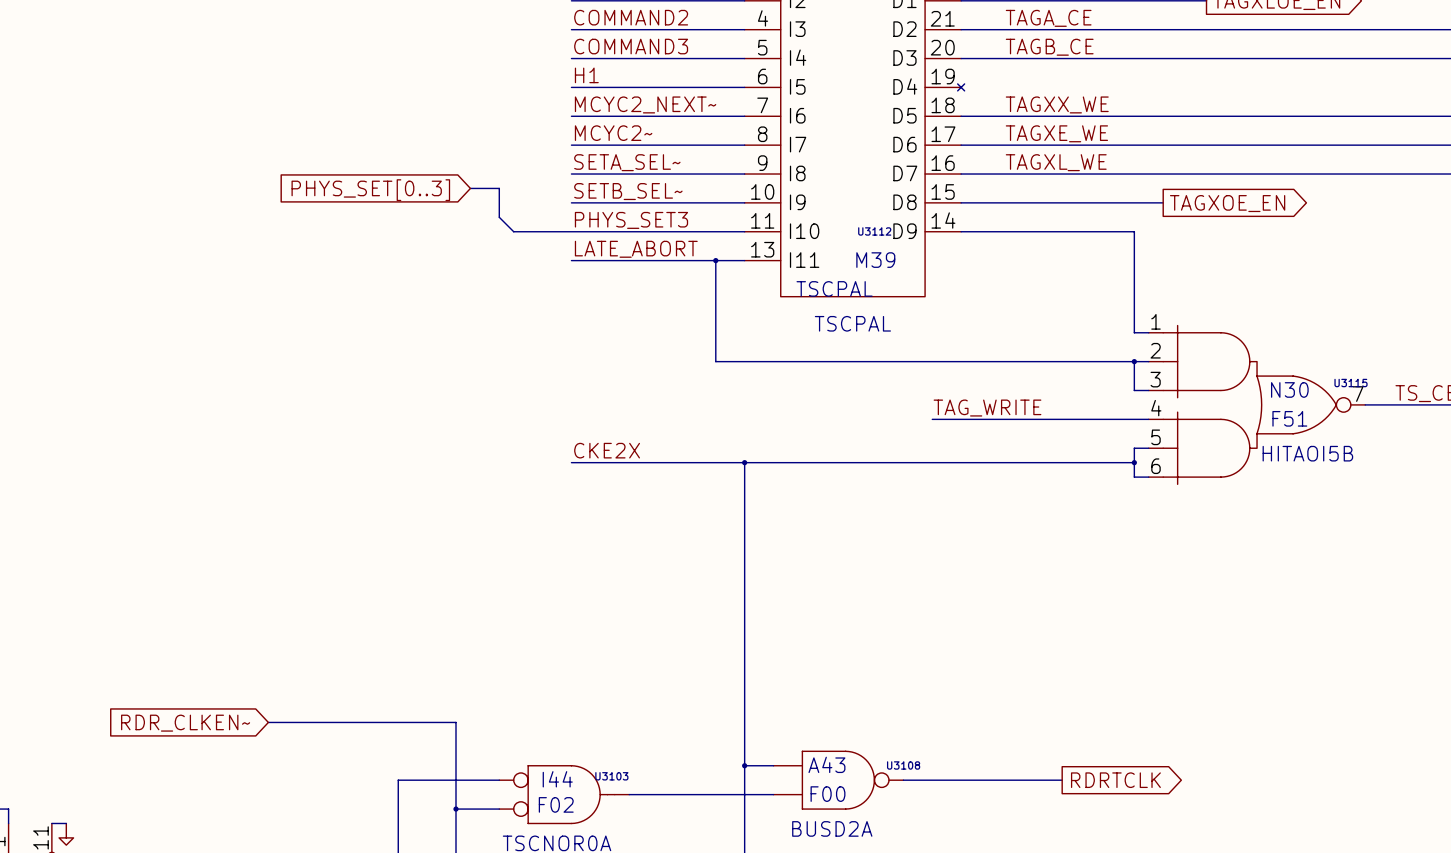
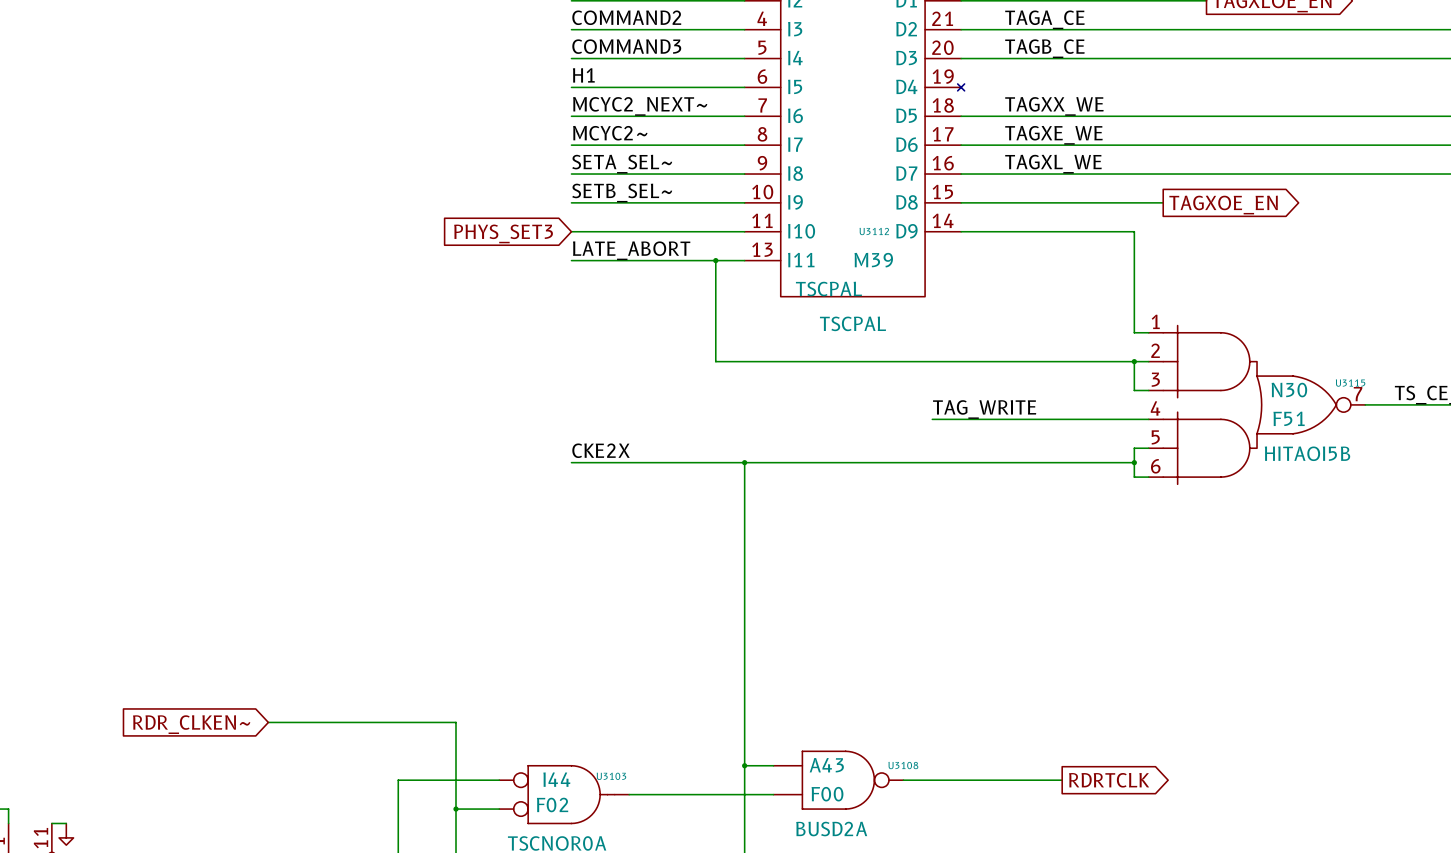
bus: (470, 188) (499, 188) (499, 217) -> none
global label: PHYS_SET[0..3] (370, 190) -> none
wire: (499, 217) (513, 231) (571, 231) -> none
label: PHYS_SET3 (631, 220) -> none
global label: none -> PHYS_SET3 (503, 233)

